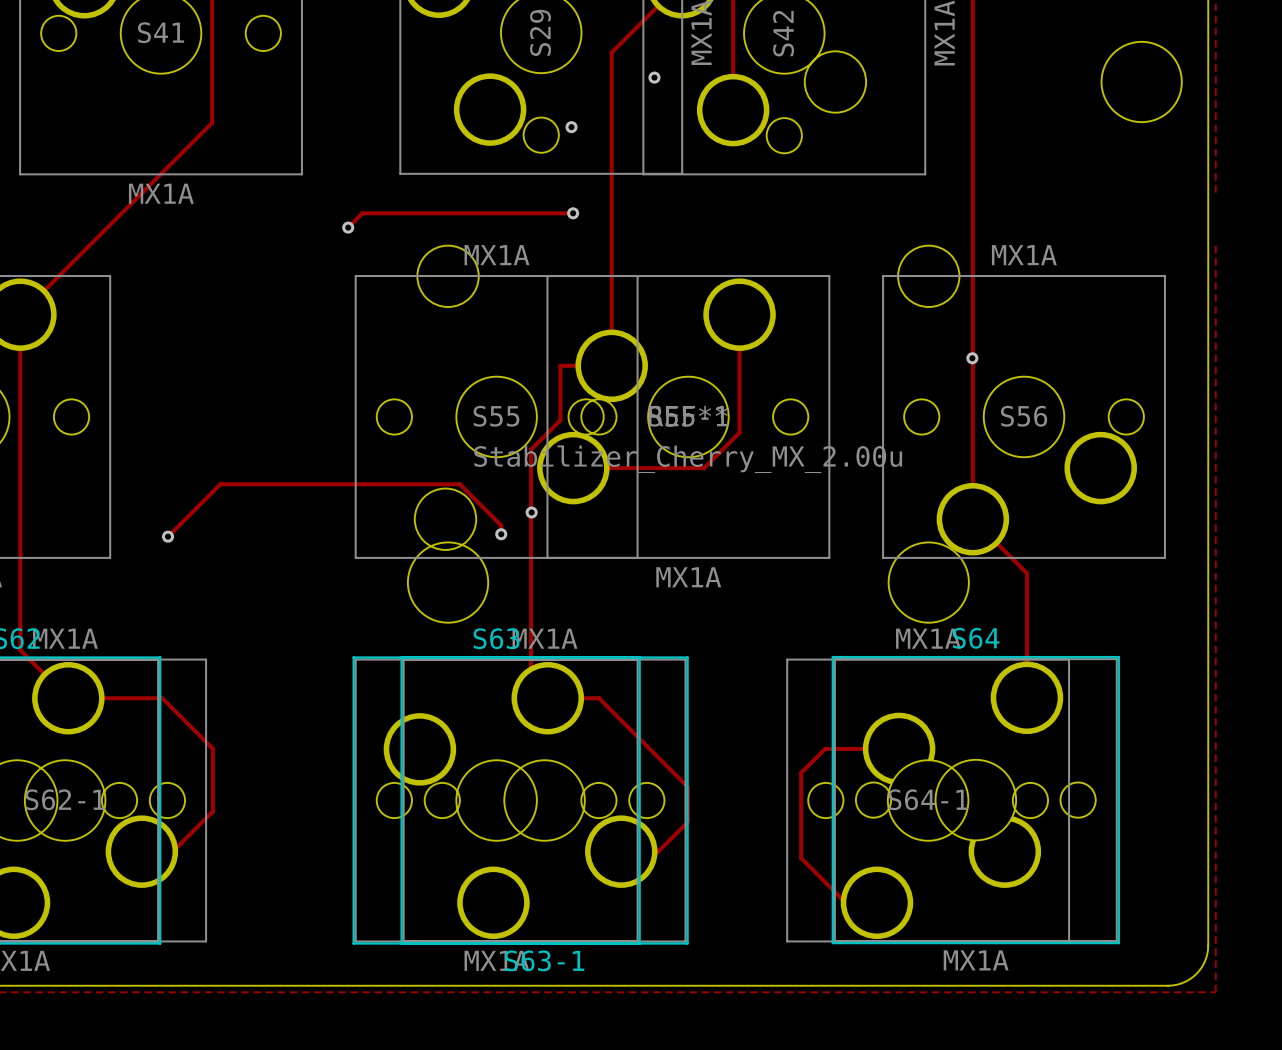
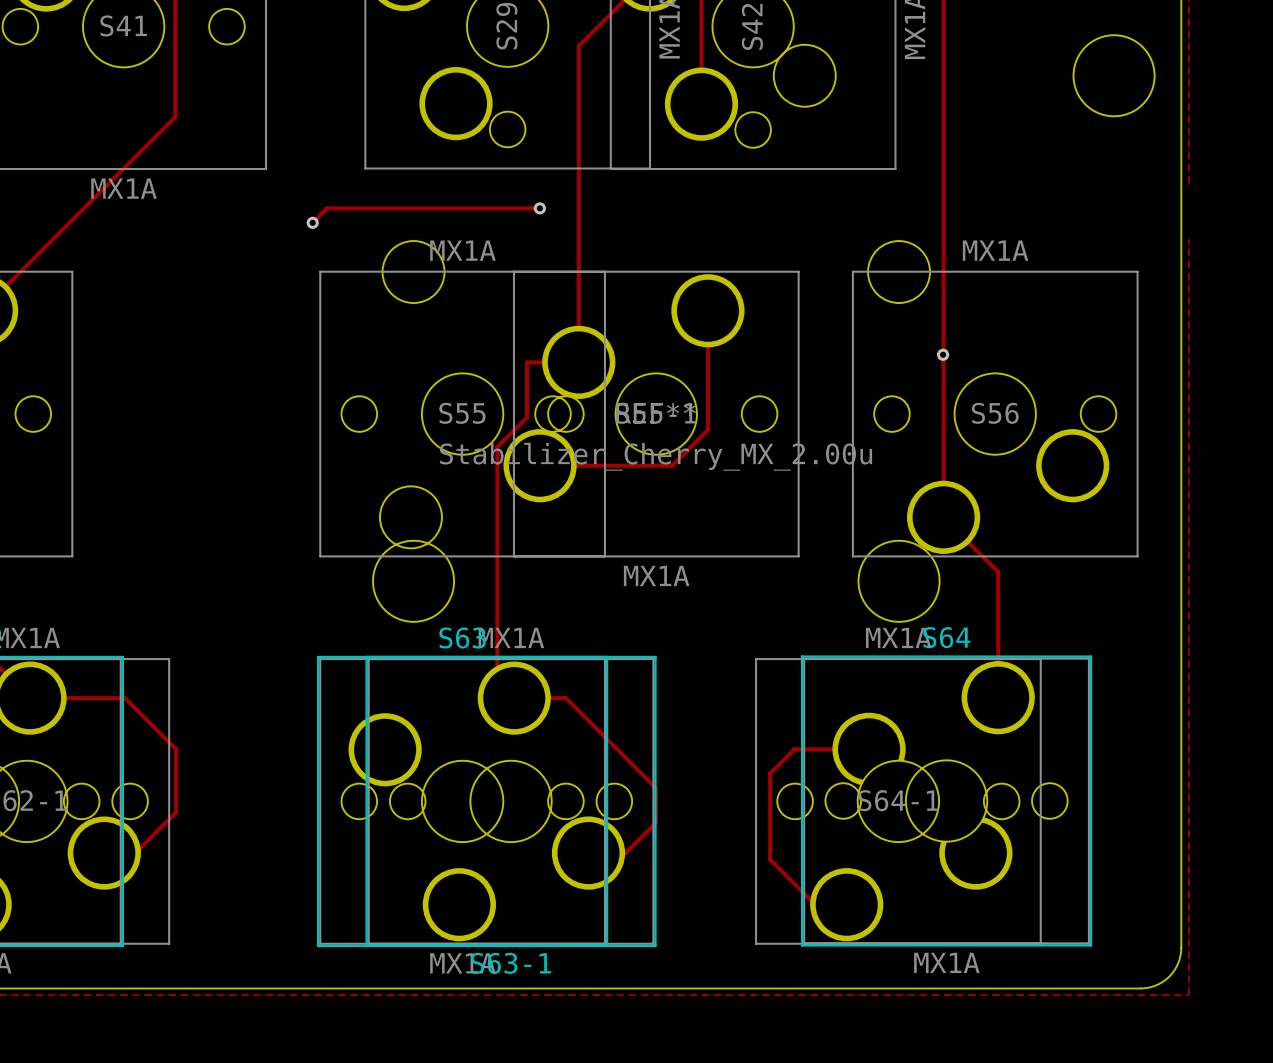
via: (654, 77) -> none
via: (571, 127) -> none
via: (531, 512) -> none
track: (501, 534) (501, 525) (459, 484) (220, 484) (168, 536) -> none
via: (501, 534) -> none
via: (168, 536) -> none

